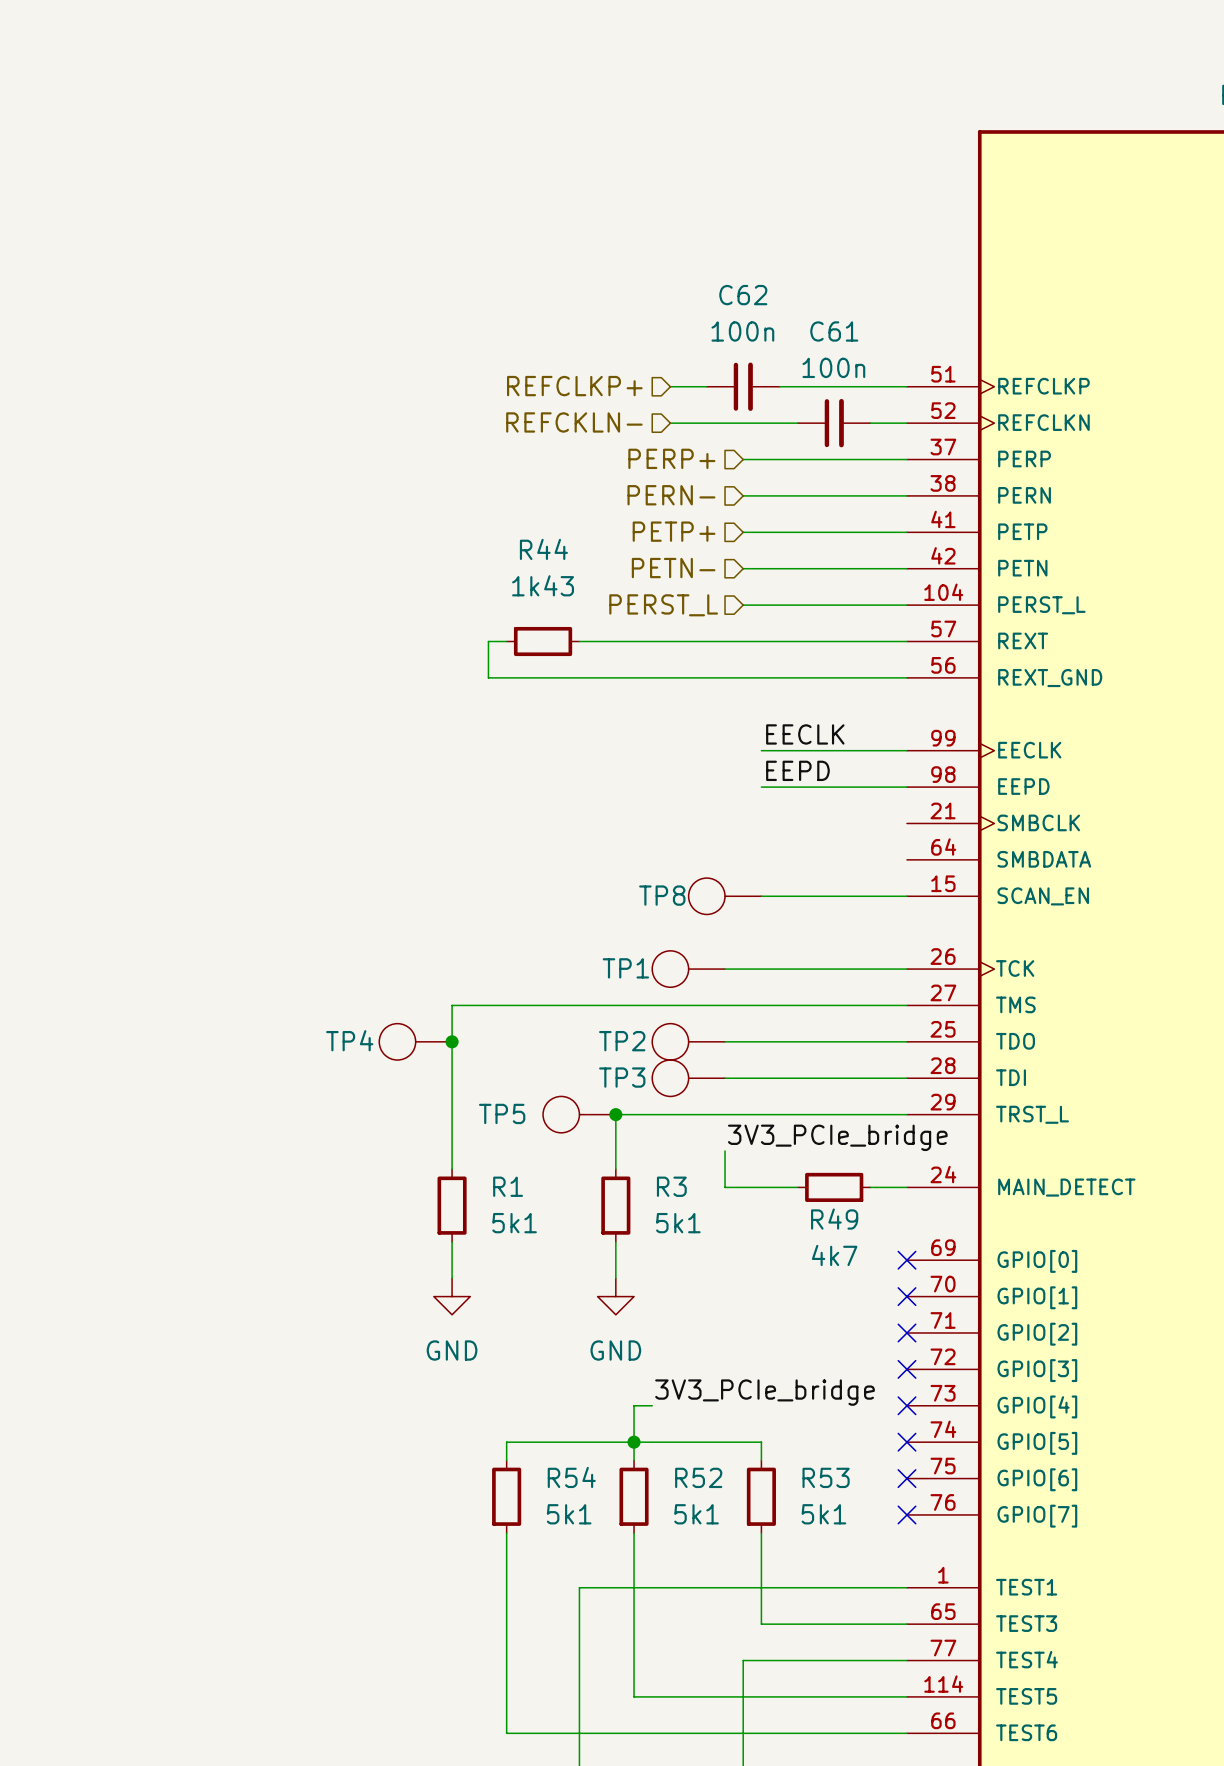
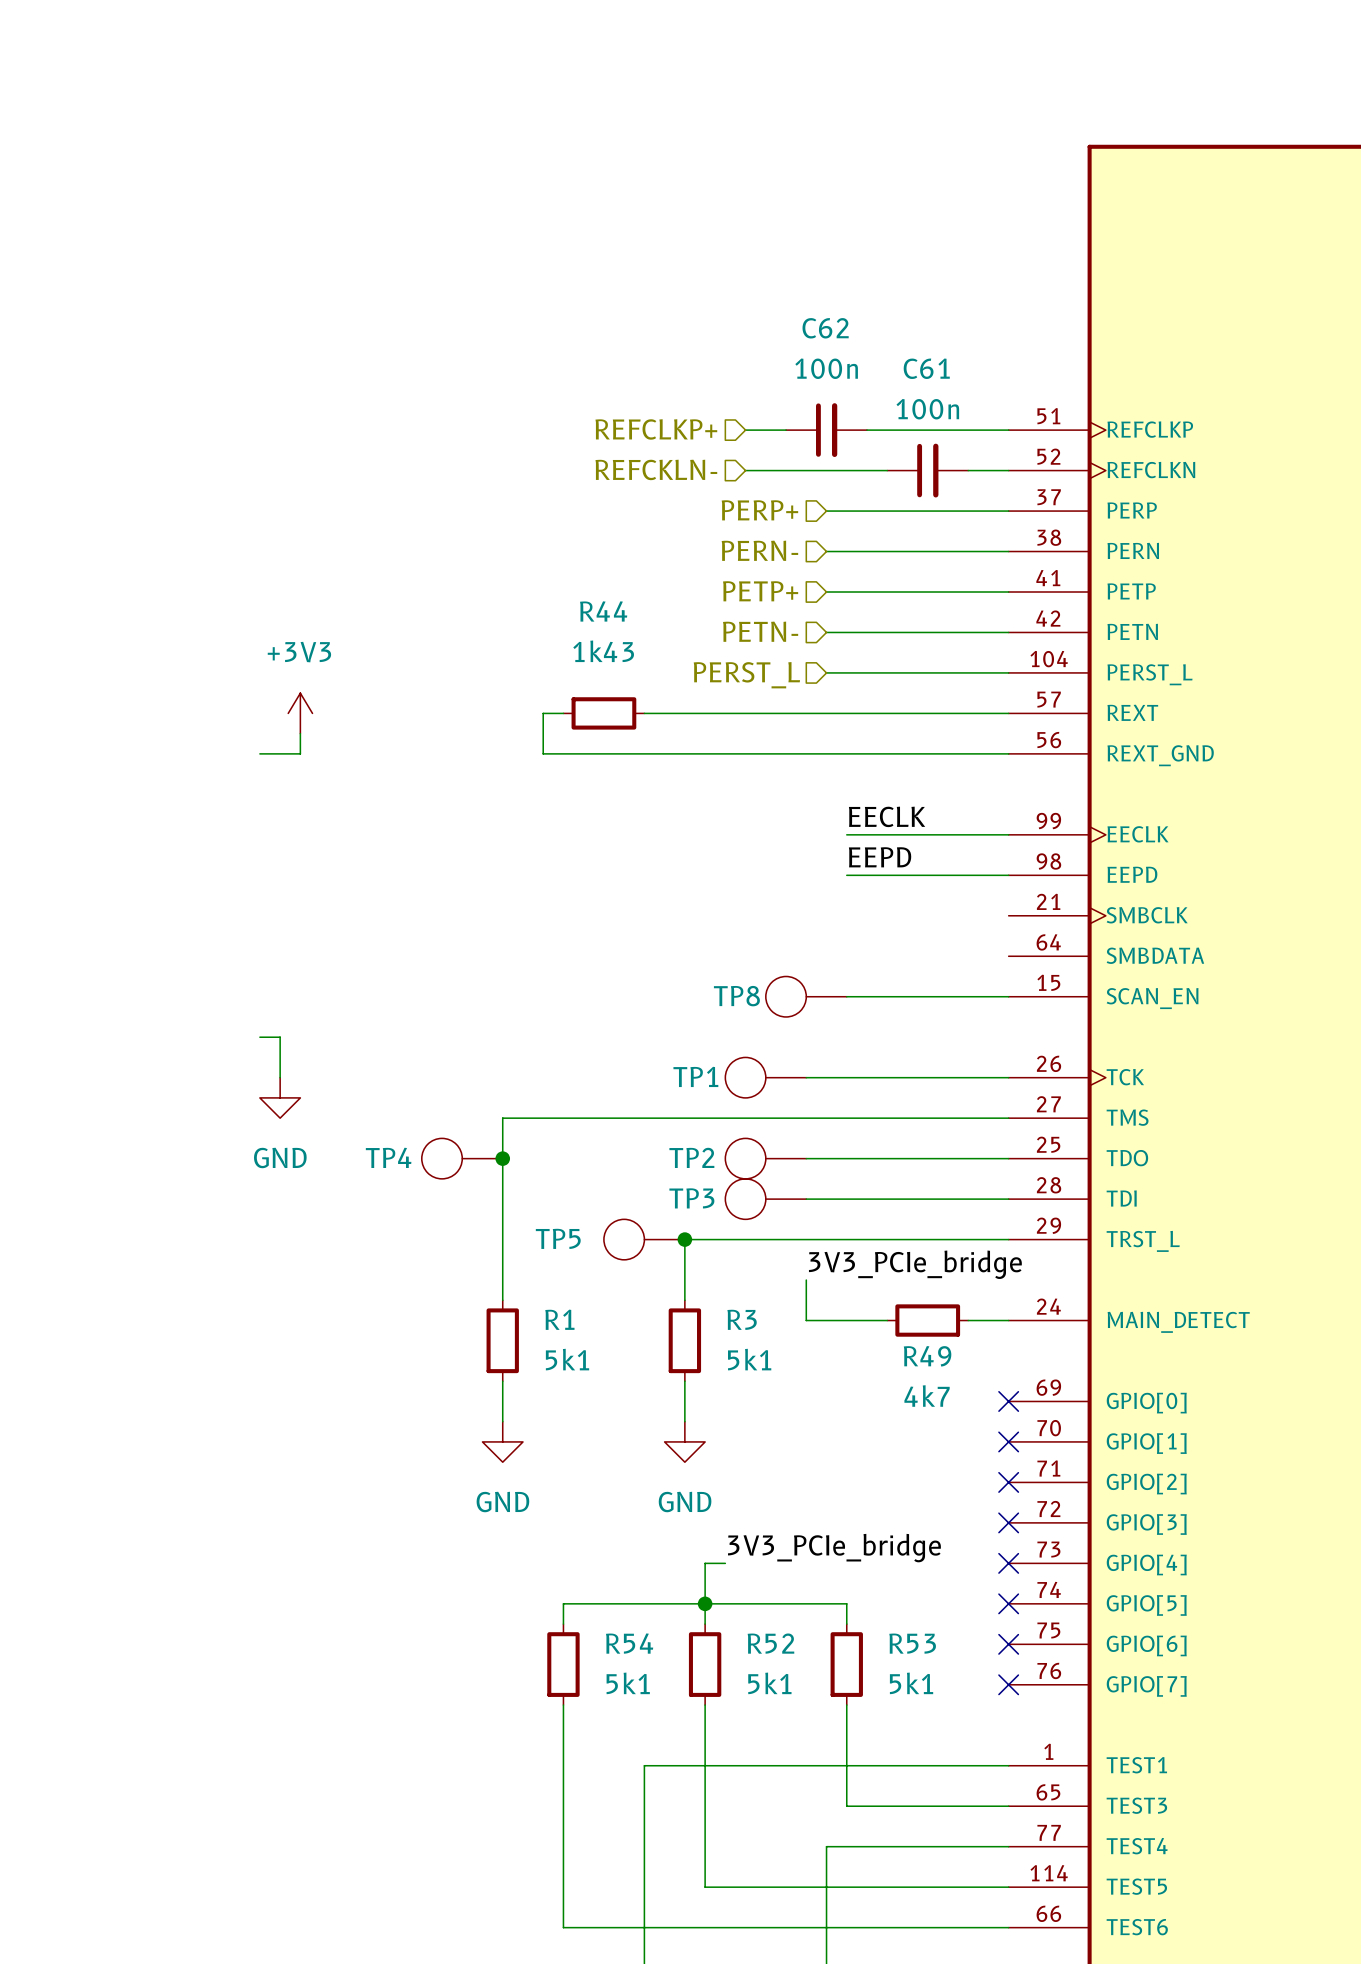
power symbol: none -> +3V3 (300, 713)
wire: none -> (300, 733) (300, 753) (259, 753)
wire: none -> (259, 1037) (280, 1037) (280, 1077)
power symbol: none -> GND (280, 1097)

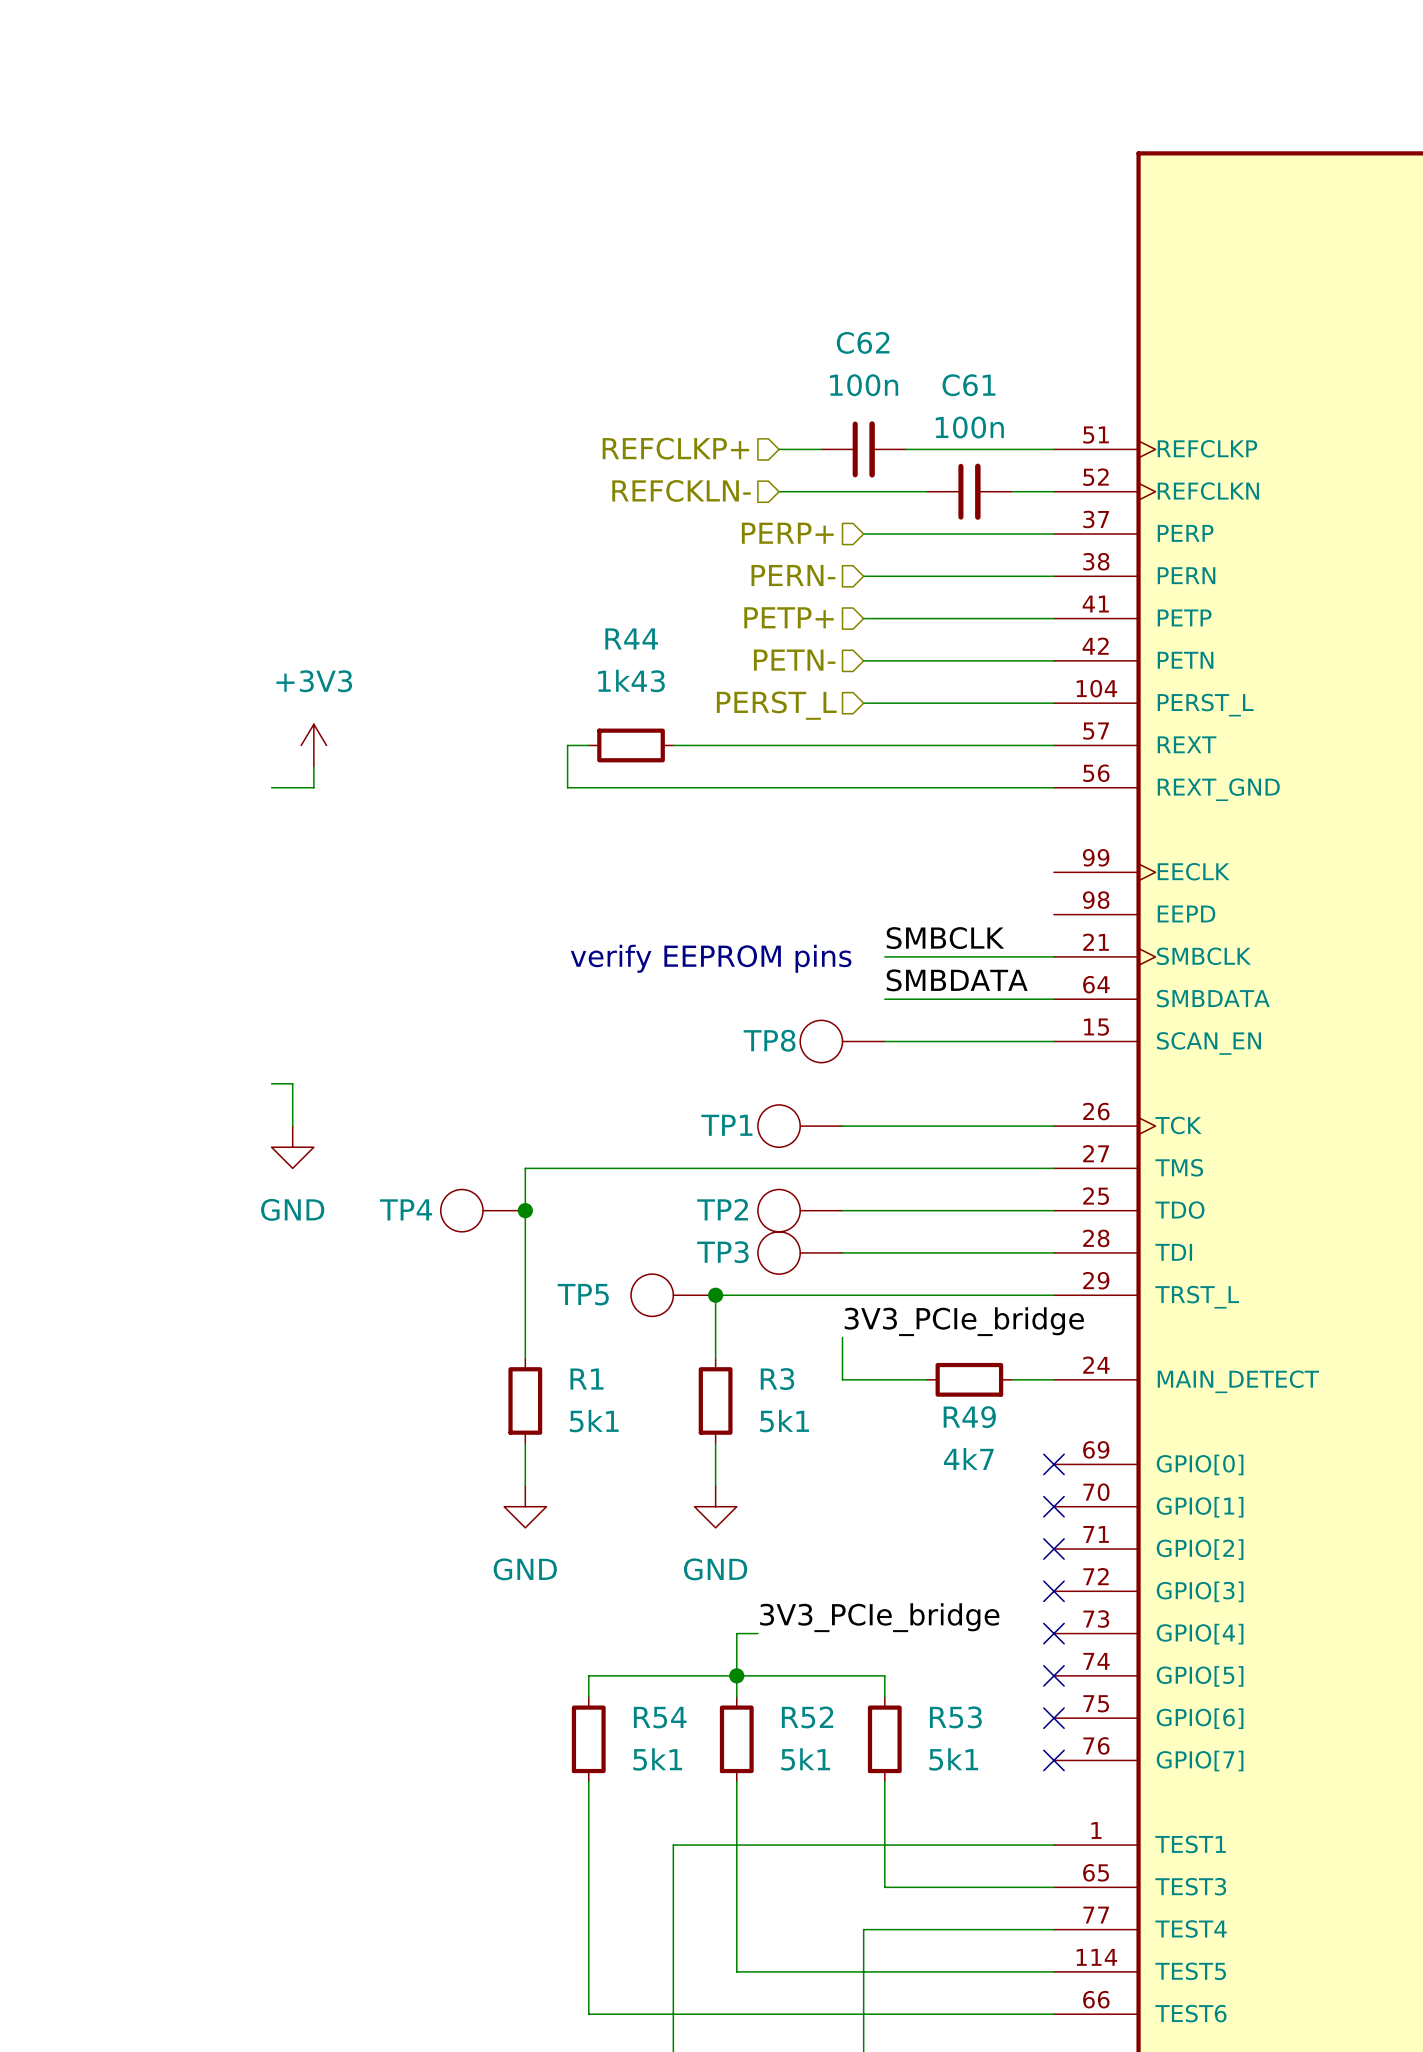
label: EECLK (887, 816) -> none
wire: (846, 834) (1008, 834) -> (884, 956) (1053, 956)
label: EEPD (880, 857) -> none
wire: (846, 875) (1008, 875) -> (884, 999) (1053, 999)
label: none -> SMBCLK (945, 938)
text: none -> verify EEPROM pins (711, 958)
label: none -> SMBDATA (957, 980)

